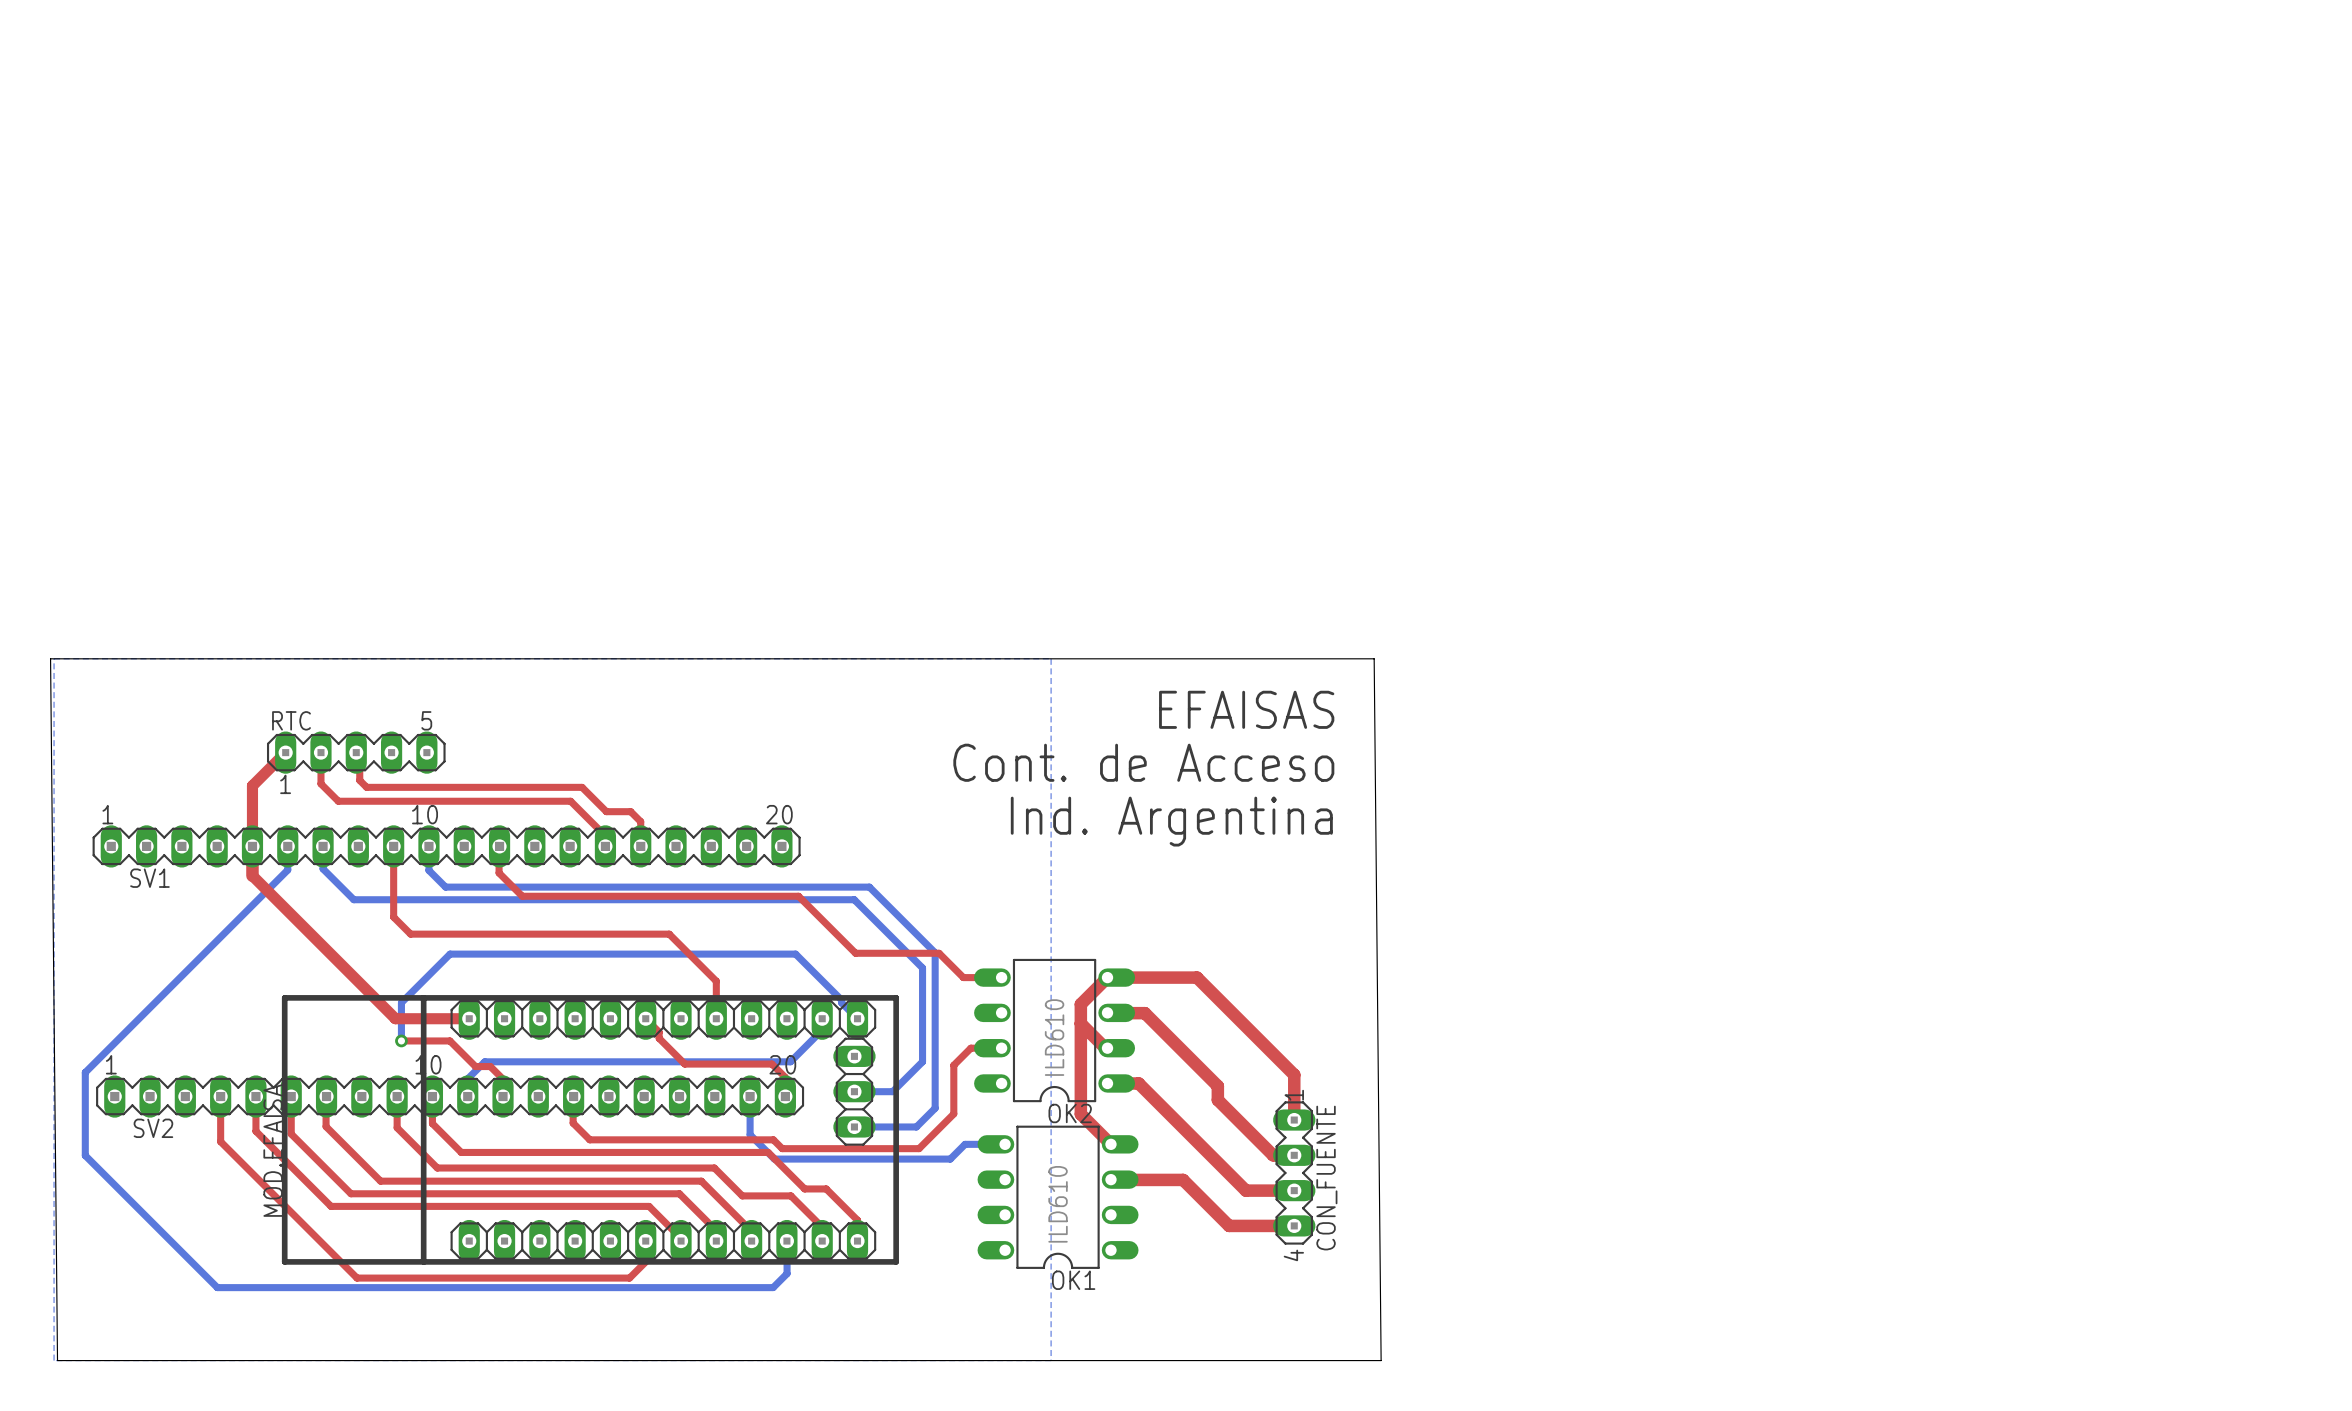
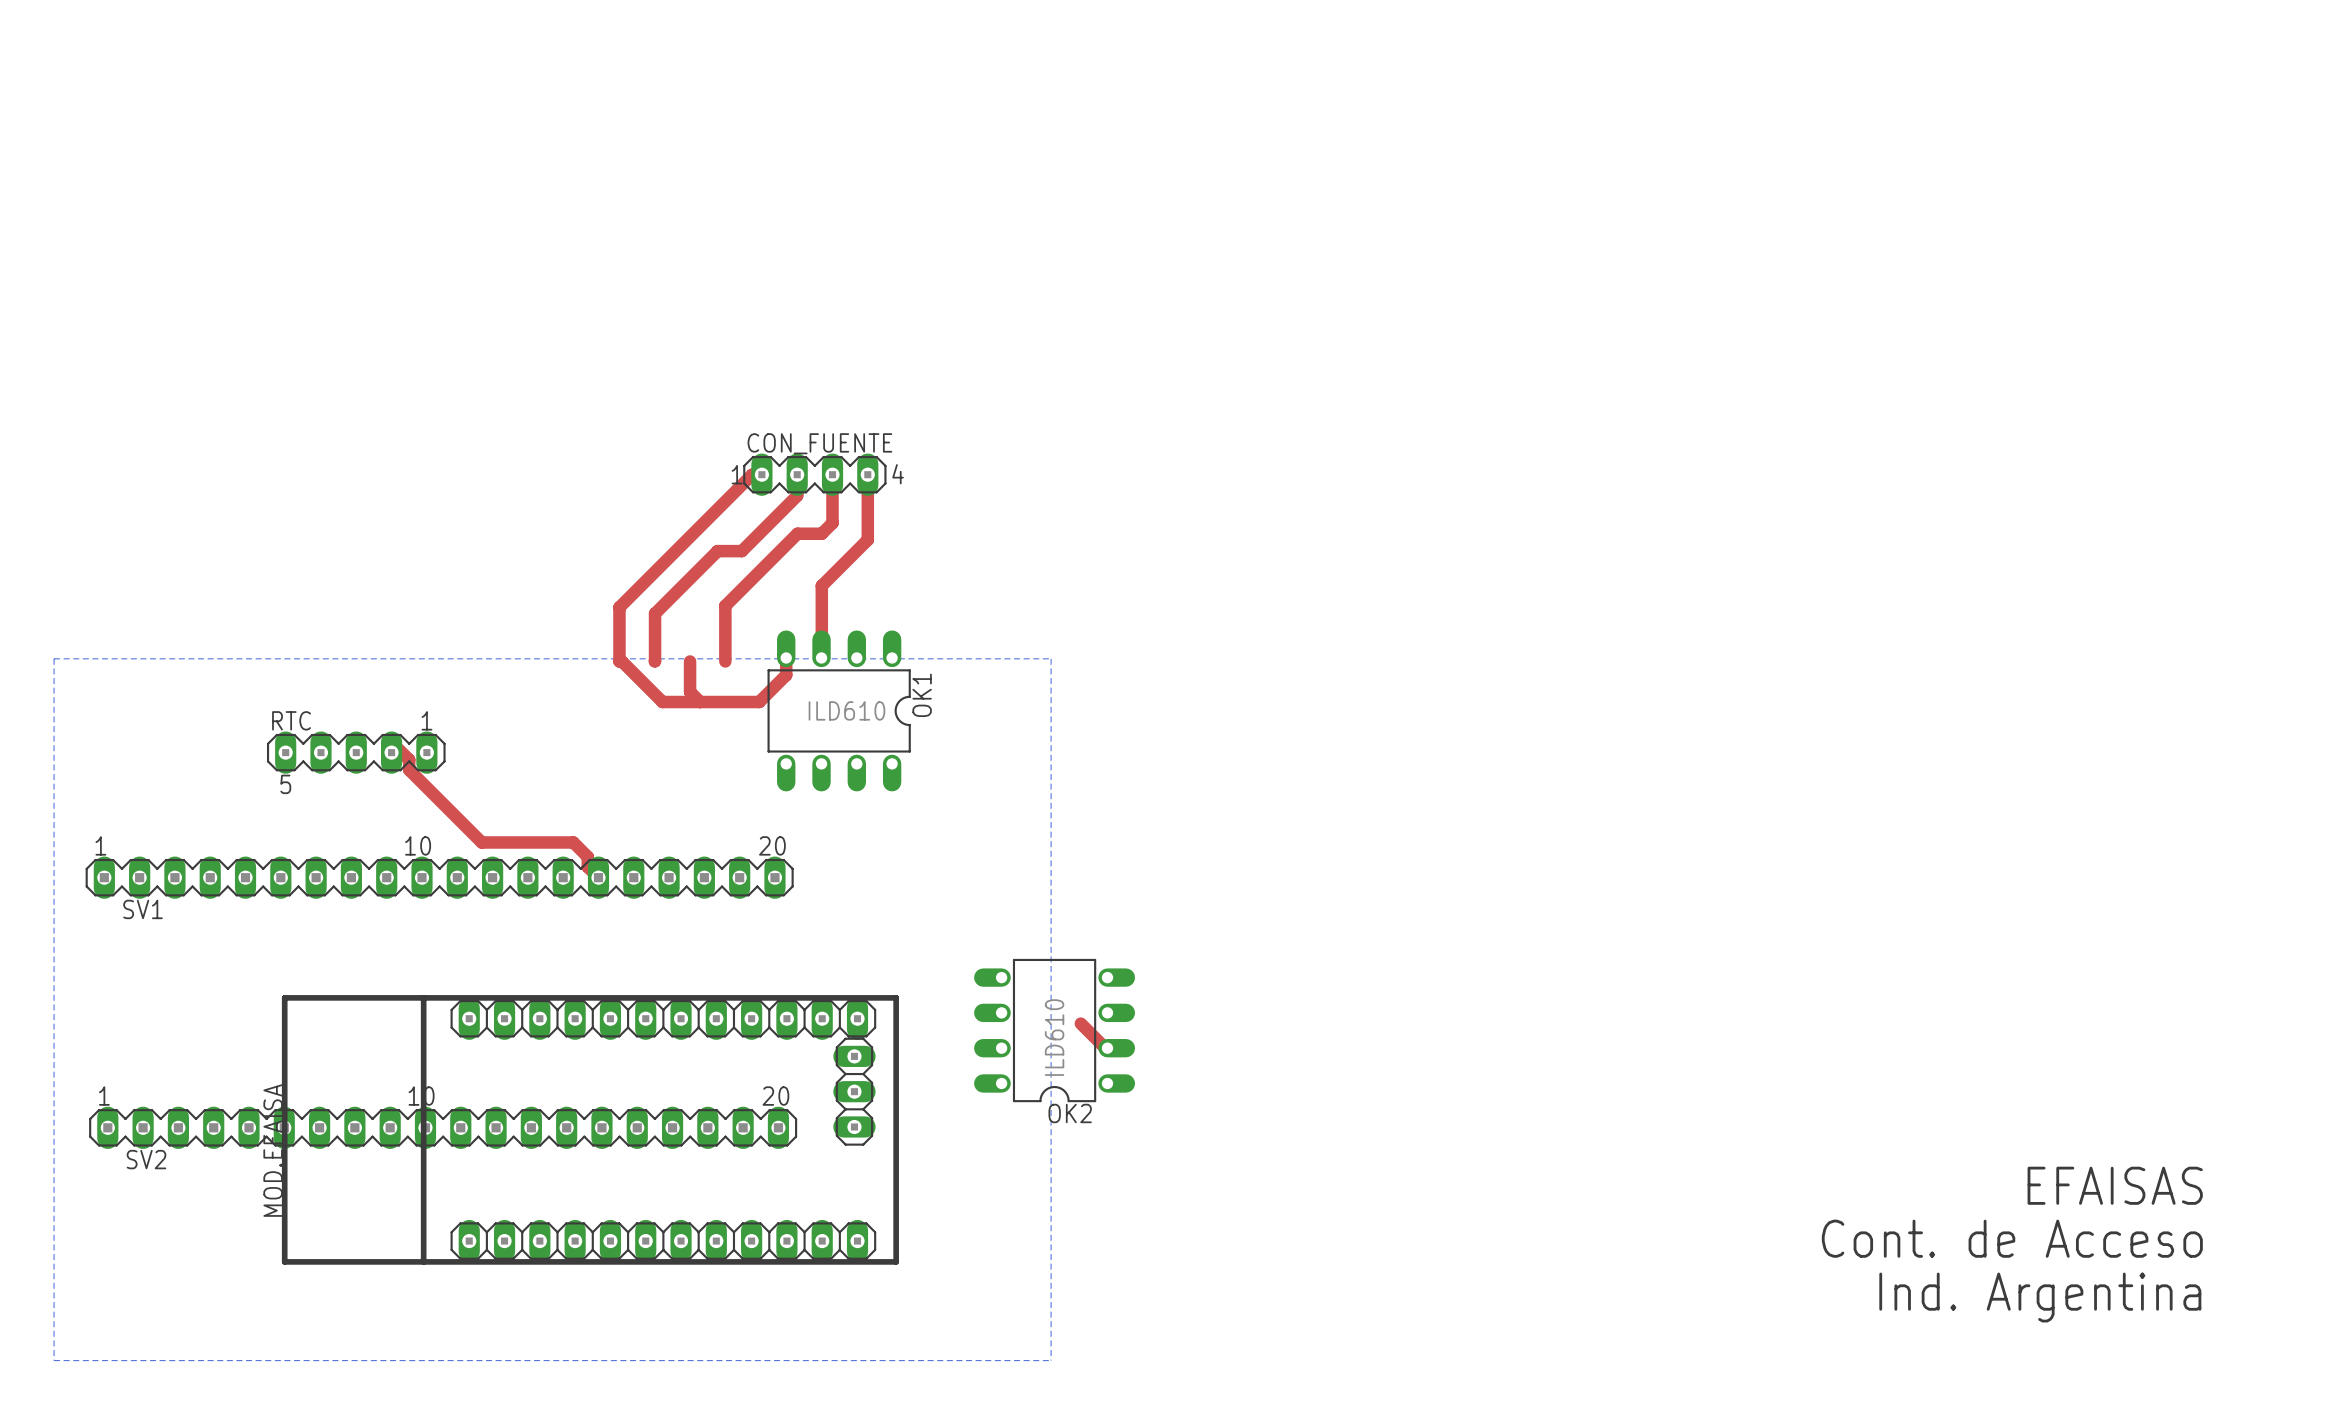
top track: none -> (761, 474) (752, 474) (619, 607) (619, 661) (621, 661) (662, 702) (759, 702) (786, 675) (786, 657)
top track: none -> (797, 474) (797, 495) (741, 551) (717, 551) (655, 613) (654, 661)
CON_FUENTE: none -> (814, 474)
top track: none -> (832, 474) (832, 523) (821, 533) (797, 533) (725, 605) (725, 661)
top track: none -> (867, 474) (867, 539) (821, 585) (821, 657)
board edge: (50, 658) (1374, 658) (1381, 1360) (57, 1360) (50, 658) -> none
top track: none -> (690, 661) (690, 691) (700, 702)
text: EFAISAS (1246, 709) -> none
RTC text position: 5 (426, 720) -> 5 (285, 784)
top track: none -> (398, 749) (409, 759) (409, 769) (481, 842) (573, 842) (587, 856) (587, 866) (598, 877)
top track: (285, 752) (252, 785) (252, 875) (395, 1018) (469, 1018) -> none
top track: (320, 752) (320, 783) (338, 801) (570, 801) (605, 835) (605, 846) -> none
top track: (356, 752) (359, 756) (359, 780) (366, 787) (582, 787) (606, 811) (630, 811) (640, 821) (640, 846) -> none
text: Cont. de Acceso (1143, 762) -> none
RTC text position: 1 (285, 784) -> 1 (426, 720)
text: Ind. Argentina (1171, 821) -> none
bottom track: (287, 846) (287, 870) (85, 1072) (85, 1155) (217, 1287) (773, 1287) (787, 1273) (787, 1241) -> none
bottom track: (323, 846) (323, 868) (353, 899) (854, 899) (922, 968) (922, 1061) (892, 1091) (854, 1091) -> none
top track: (393, 846) (393, 917) (410, 934) (669, 934) (716, 981) (716, 1018) -> none
bottom track: (428, 846) (428, 870) (445, 887) (869, 887) (935, 952) (935, 1108) (916, 1126) (854, 1126) -> none
SV1 position: (446, 846) -> (439, 877)
top track: (499, 846) (499, 873) (522, 896) (798, 896) (855, 953) (939, 953) (963, 977) (1001, 977) -> none
top track: (1107, 1012) (1144, 1013) (1217, 1086) (1217, 1100) (1273, 1155) (1294, 1155) -> none
top track: (645, 1018) (659, 1032) (659, 1038) (684, 1064) (771, 1064) (785, 1077) (785, 1096) -> none
bottom track: (822, 1018) (822, 1030) (790, 1061) (484, 1061) (467, 1078) (467, 1096) -> none
bottom track: (857, 1018) (795, 954) (450, 954) (401, 1002) (401, 1040) -> none
top track: (401, 1040) (449, 1040) (475, 1066) (490, 1066) (503, 1079) (503, 1096) -> none
via: (401, 1040) -> none
top track: (1001, 1048) (970, 1048) (953, 1065) (953, 1113) (919, 1148) (782, 1148) (773, 1139) (589, 1139) (573, 1123) (573, 1096) -> none
top track: (1107, 1083) (1138, 1083) (1245, 1190) (1294, 1190) -> none
top track: (220, 1096) (220, 1141) (357, 1278) (629, 1278) (645, 1261) (645, 1241) -> none
top track: (255, 1096) (255, 1131) (331, 1206) (649, 1206) (681, 1238) (681, 1241) -> none
top track: (291, 1096) (291, 1134) (350, 1193) (679, 1193) (716, 1230) (716, 1241) -> none
top track: (326, 1096) (326, 1126) (380, 1181) (701, 1181) (751, 1231) (751, 1241) -> none
top track: (397, 1096) (397, 1127) (437, 1168) (714, 1168) (742, 1195) (790, 1195) (822, 1227) (822, 1241) -> none
top track: (432, 1096) (432, 1123) (461, 1152) (768, 1152) (804, 1188) (826, 1188) (857, 1220) (857, 1241) -> none
SV2 position: (450, 1096) -> (443, 1127)
bottom track: (750, 1096) (750, 1134) (774, 1159) (950, 1159) (965, 1144) (1005, 1144) -> none
top track: (1294, 1120) (1294, 1074) (1197, 977) (1107, 977) (1080, 1004) (1080, 1114) (1110, 1144) -> none
CON_FUENTE: (1294, 1172) -> none
top track: (1110, 1179) (1183, 1179) (1229, 1225) (1294, 1225) -> none
text: none -> EFAISAS (2115, 1185)
OK1 rotation: 0° (1058, 1197) -> 90° counterclockwise (839, 710)
OK1 position: (1058, 1197) -> (839, 710)
text: none -> Cont. de Acceso (2012, 1238)
text: none -> Ind. Argentina (2040, 1297)

